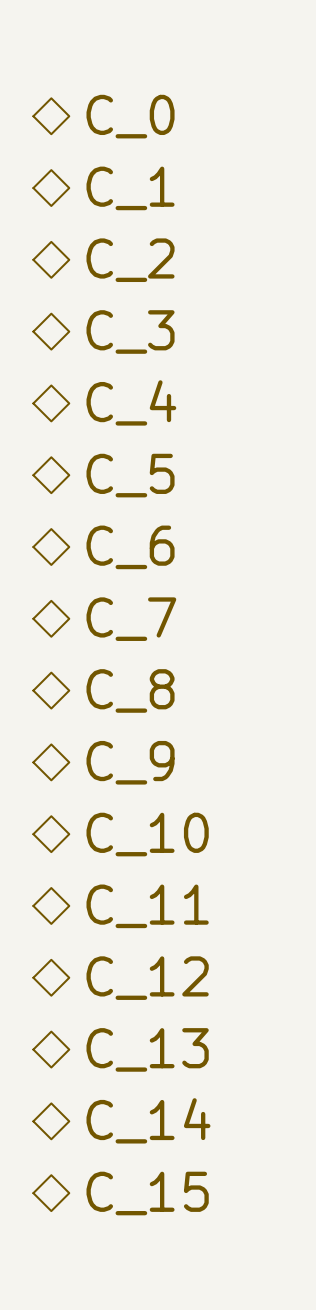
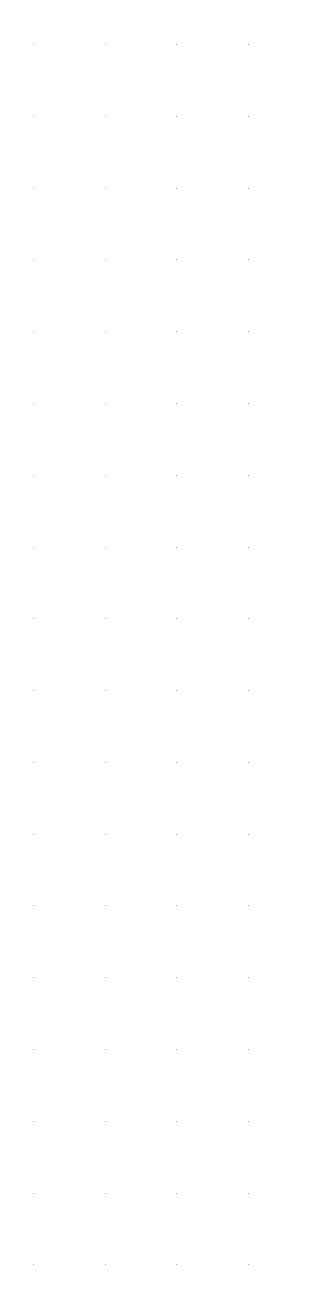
hierarchical label: C_0 (130, 116) -> none
hierarchical label: C_1 (130, 188) -> none
hierarchical label: C_2 (130, 260) -> none
hierarchical label: C_3 (130, 332) -> none
hierarchical label: C_4 (131, 402) -> none
hierarchical label: C_5 (130, 475) -> none
hierarchical label: C_6 (130, 547) -> none
hierarchical label: C_7 (131, 619) -> none
hierarchical label: C_8 (130, 690) -> none
hierarchical label: C_9 (130, 762) -> none
hierarchical label: C_10 (147, 834) -> none
hierarchical label: C_11 (147, 906) -> none
hierarchical label: C_12 (147, 978) -> none
hierarchical label: C_13 (147, 1049) -> none
hierarchical label: C_14 (148, 1120) -> none
hierarchical label: C_15 (147, 1193) -> none

